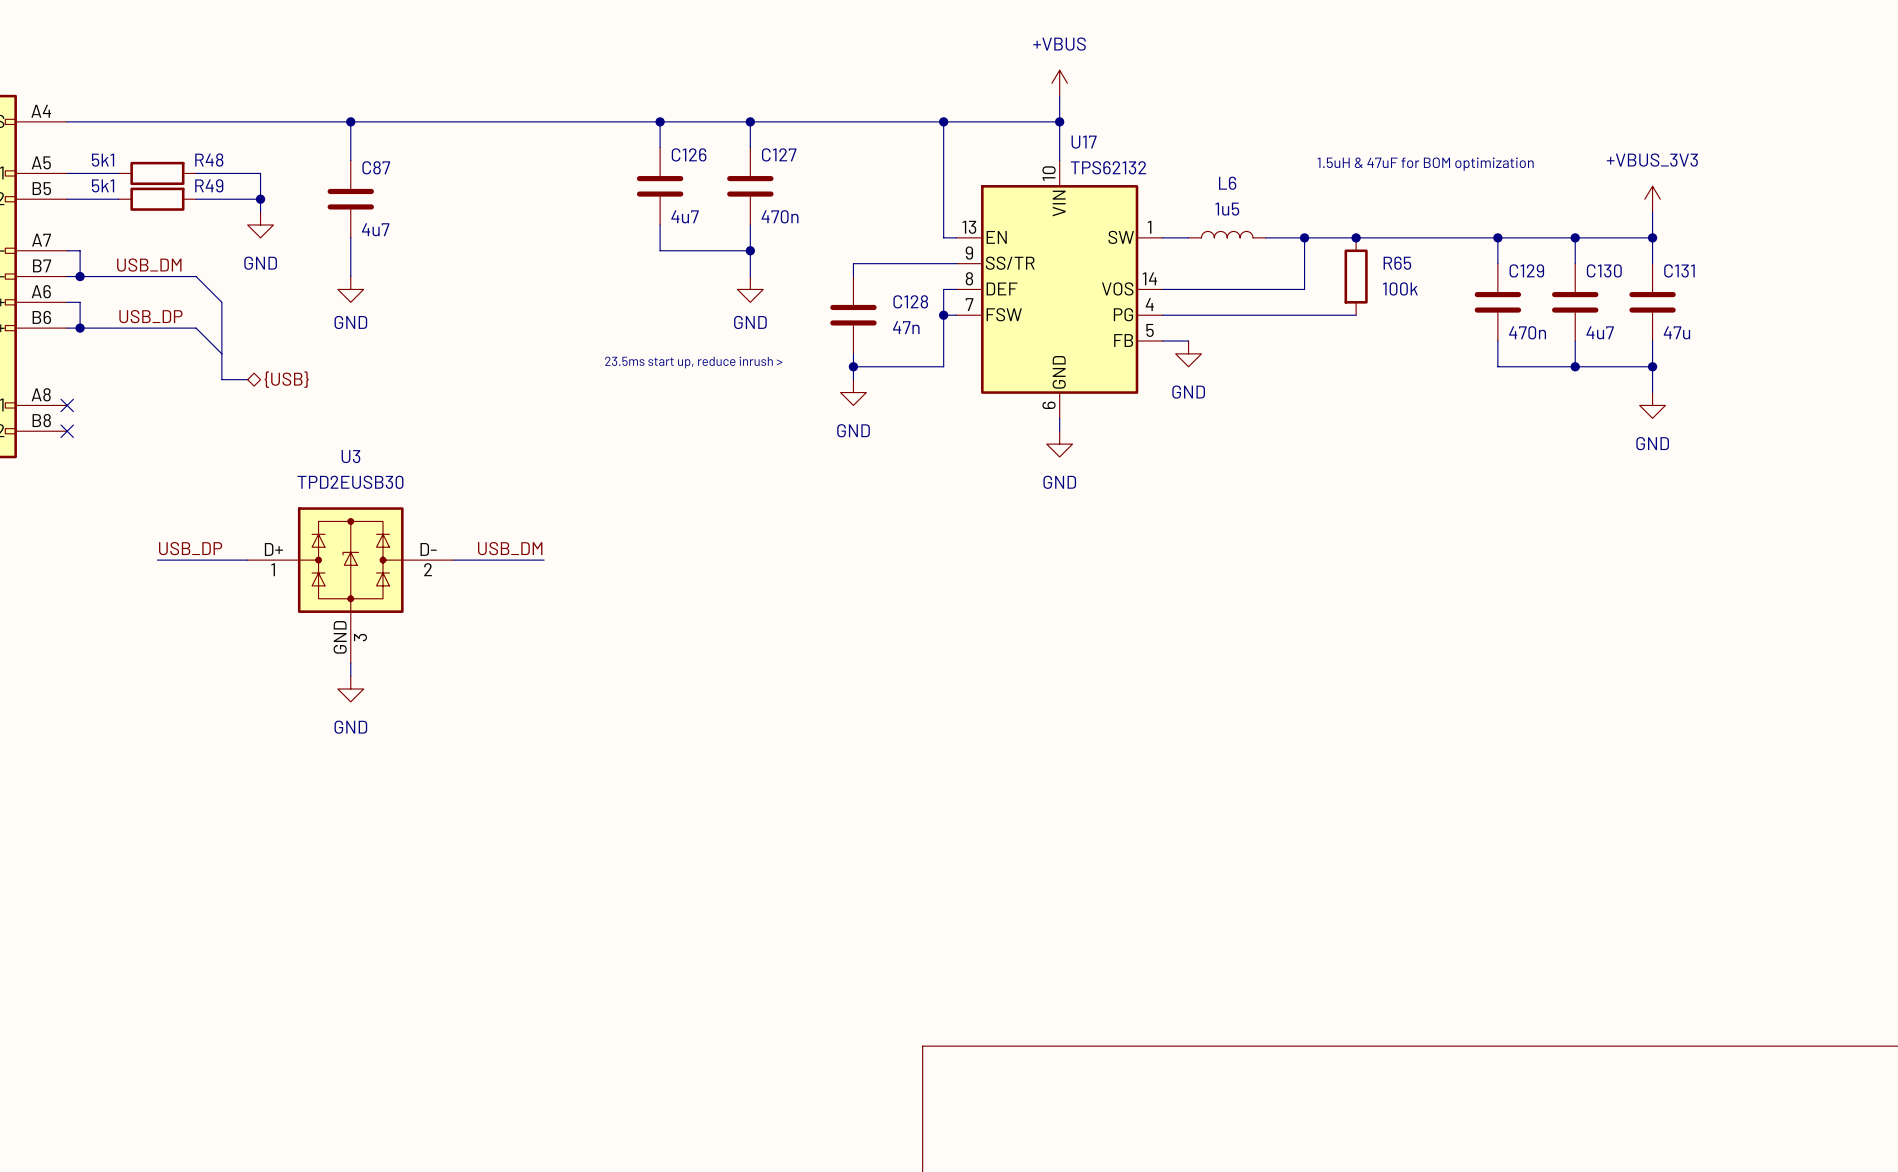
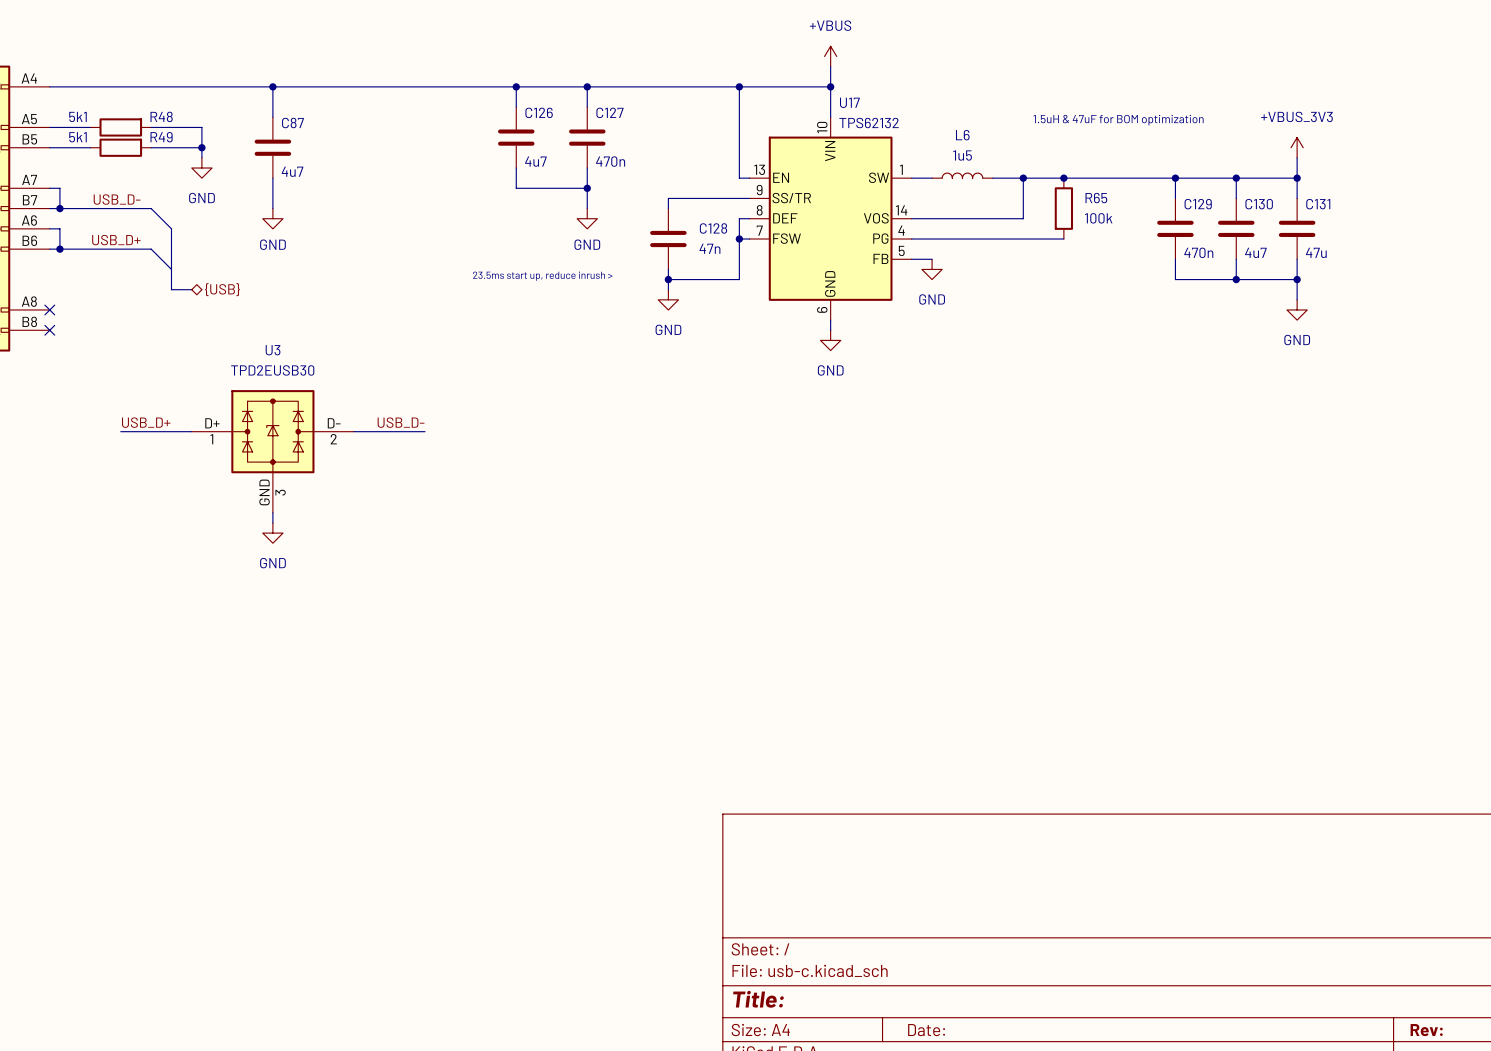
label: USB_DM (149, 265) -> USB_D- (117, 199)
label: USB_DP (150, 316) -> USB_D+ (116, 240)
label: USB_DP (190, 548) -> USB_D+ (146, 422)
label: USB_DM (510, 548) -> USB_D- (401, 422)

